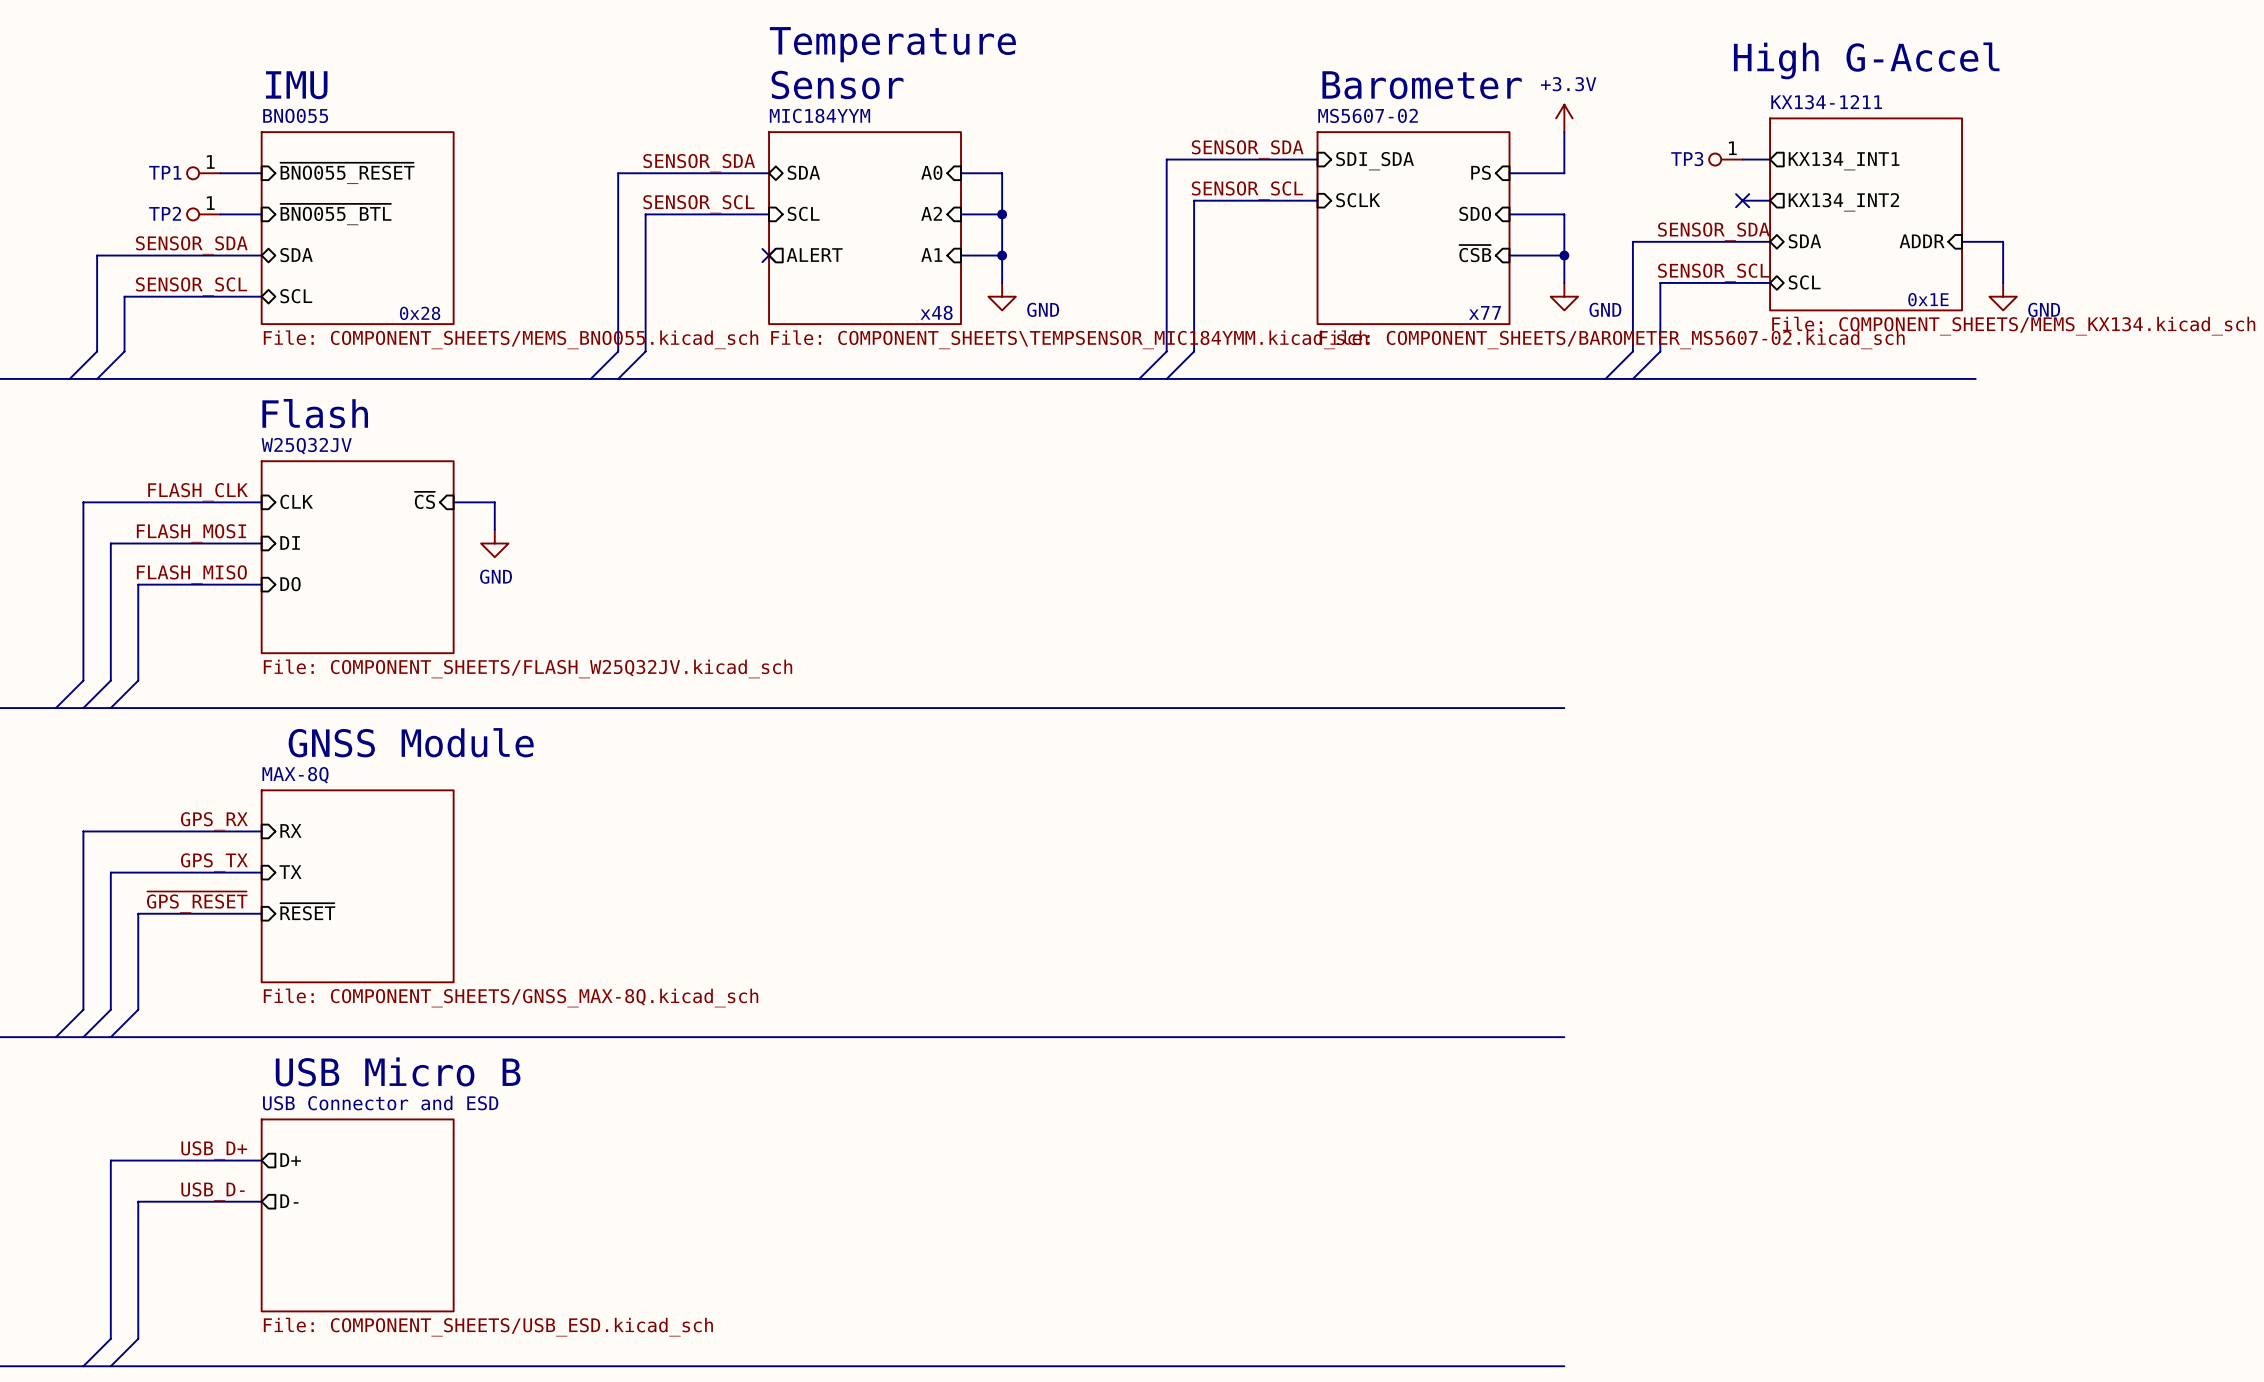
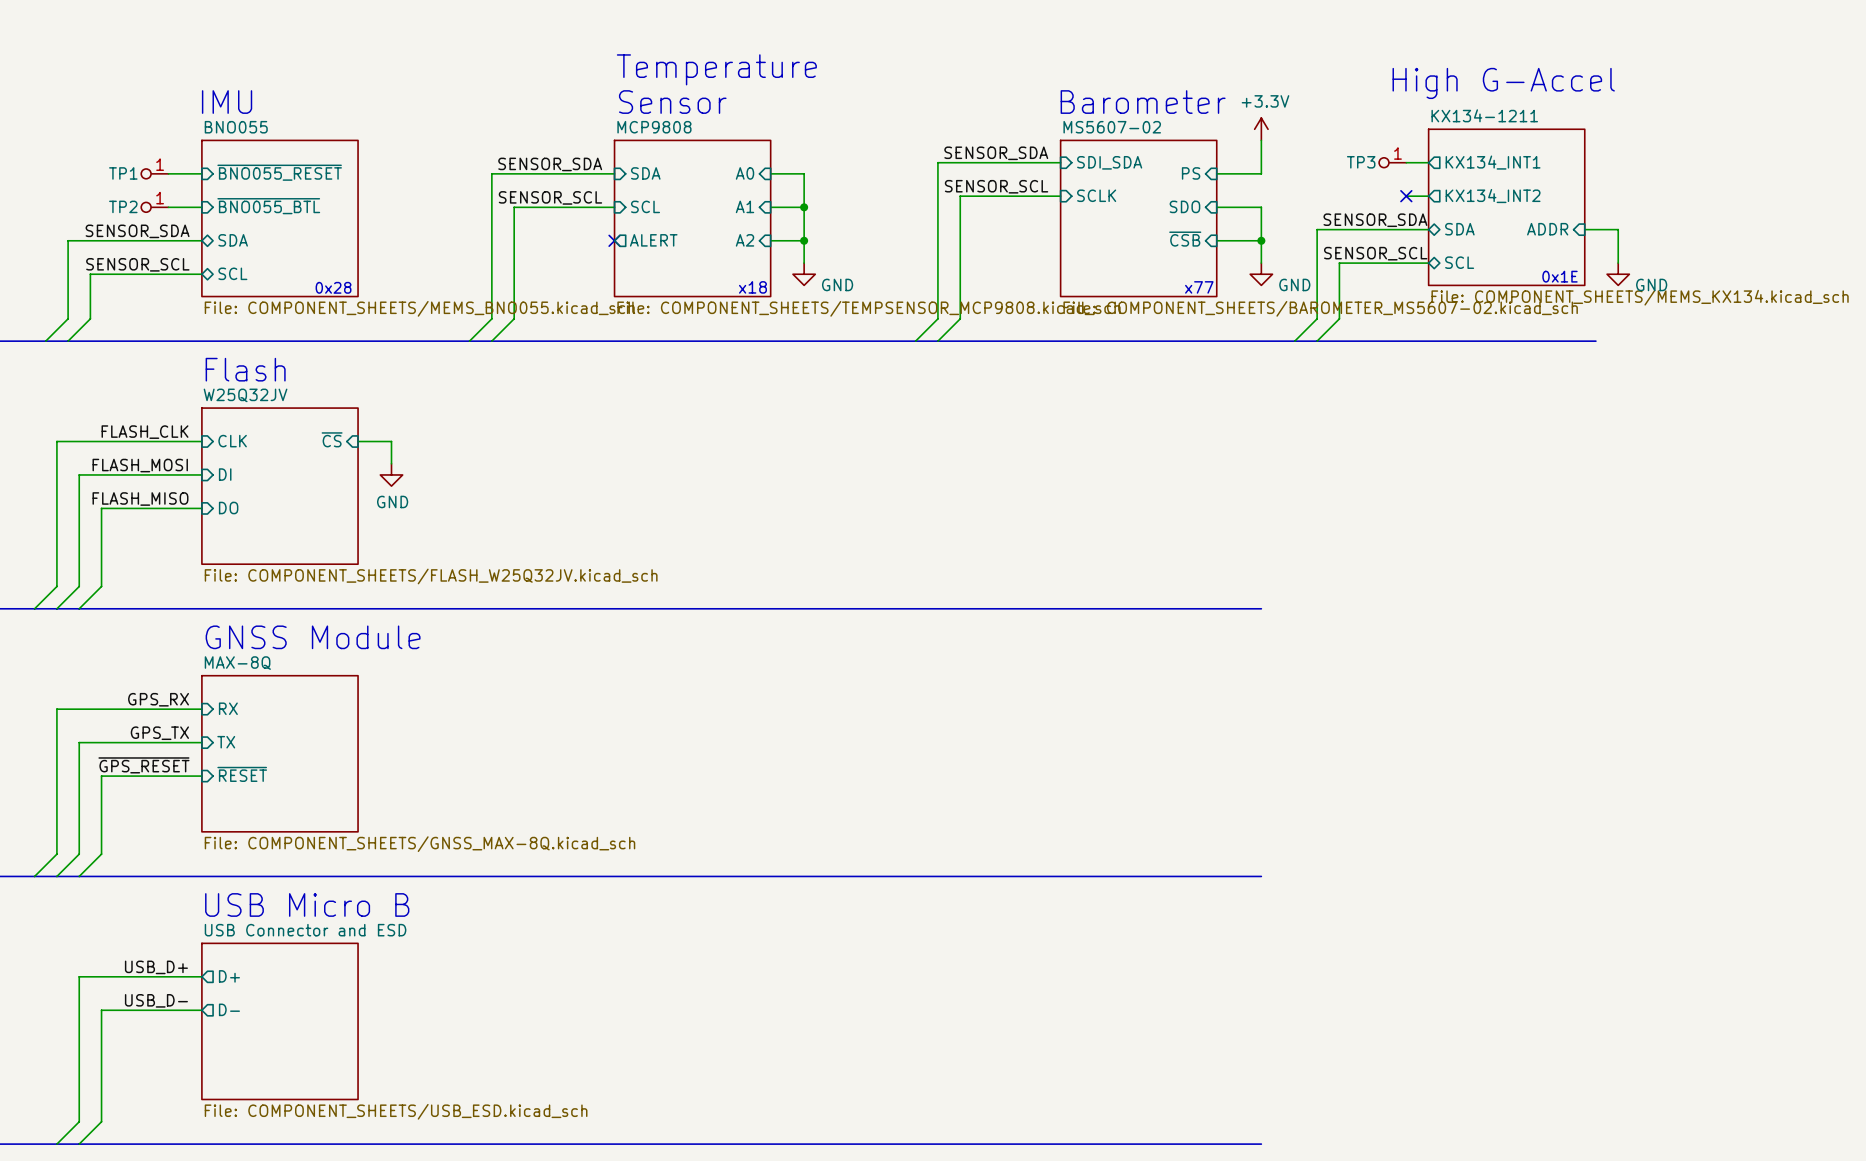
sheet pin shape: bidirectional (803, 172) -> input (645, 173)
sheet pin: A2 (931, 213) -> A1 (745, 206)
sheet MIC184YYM: File: COMPONENT_SHEETS\TEMPSENSOR_MIC184YMM.kicad_sch (865, 228) -> none
sheet MCP9808: none -> File: COMPONENT_SHEETS/TEMPSENSOR_MCP9808.kicad_sch (692, 218)
sheet pin: A1 (931, 255) -> A2 (745, 240)
text: x48 (936, 312) -> x18 (752, 287)

